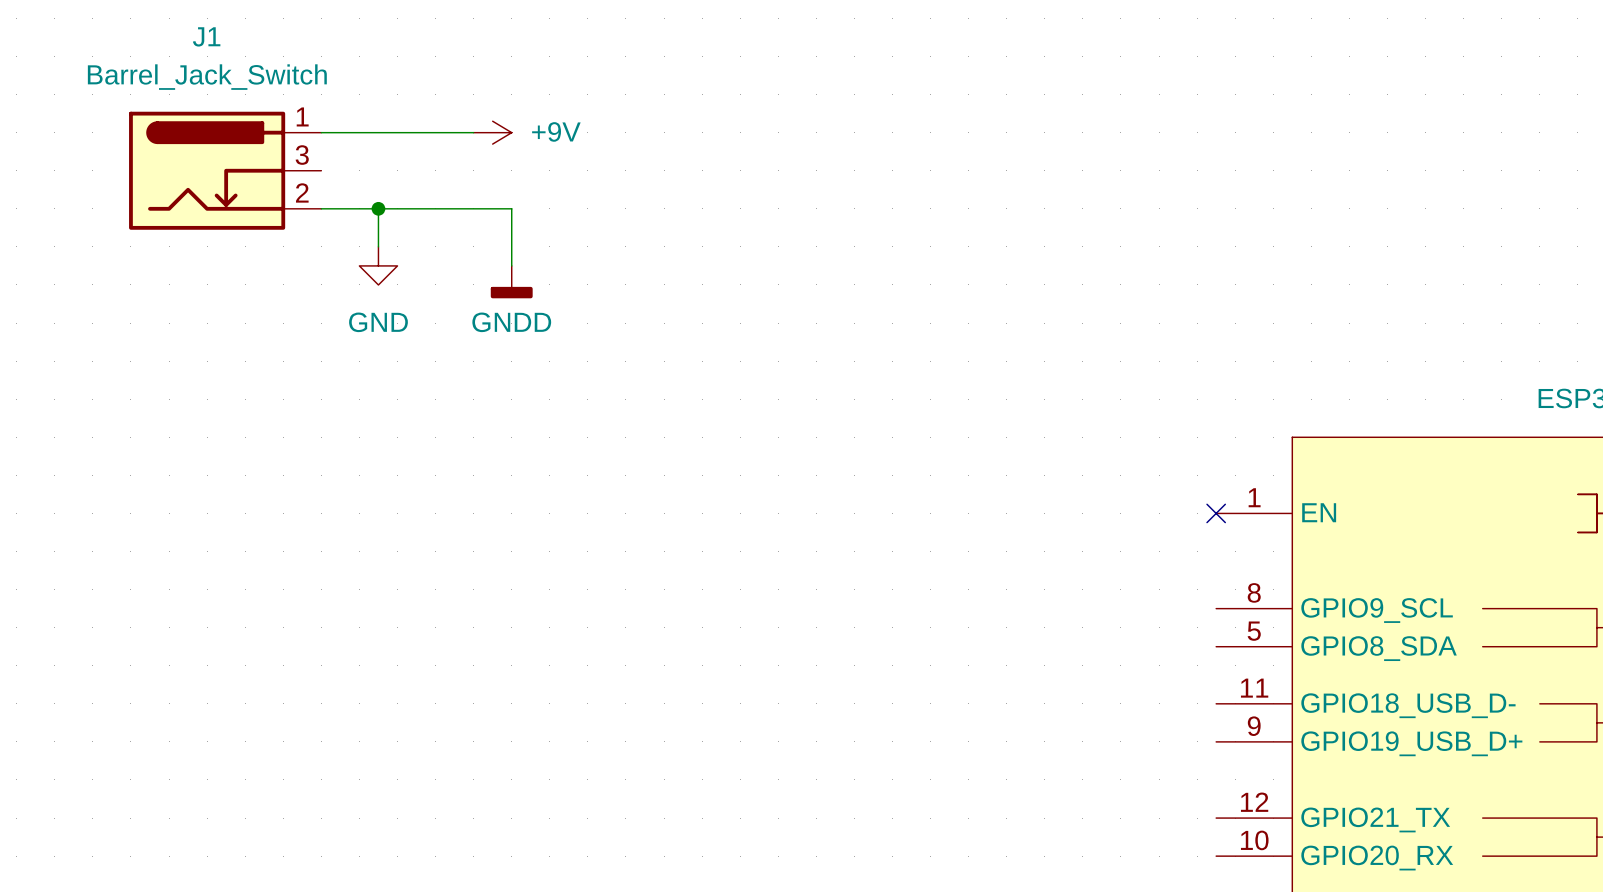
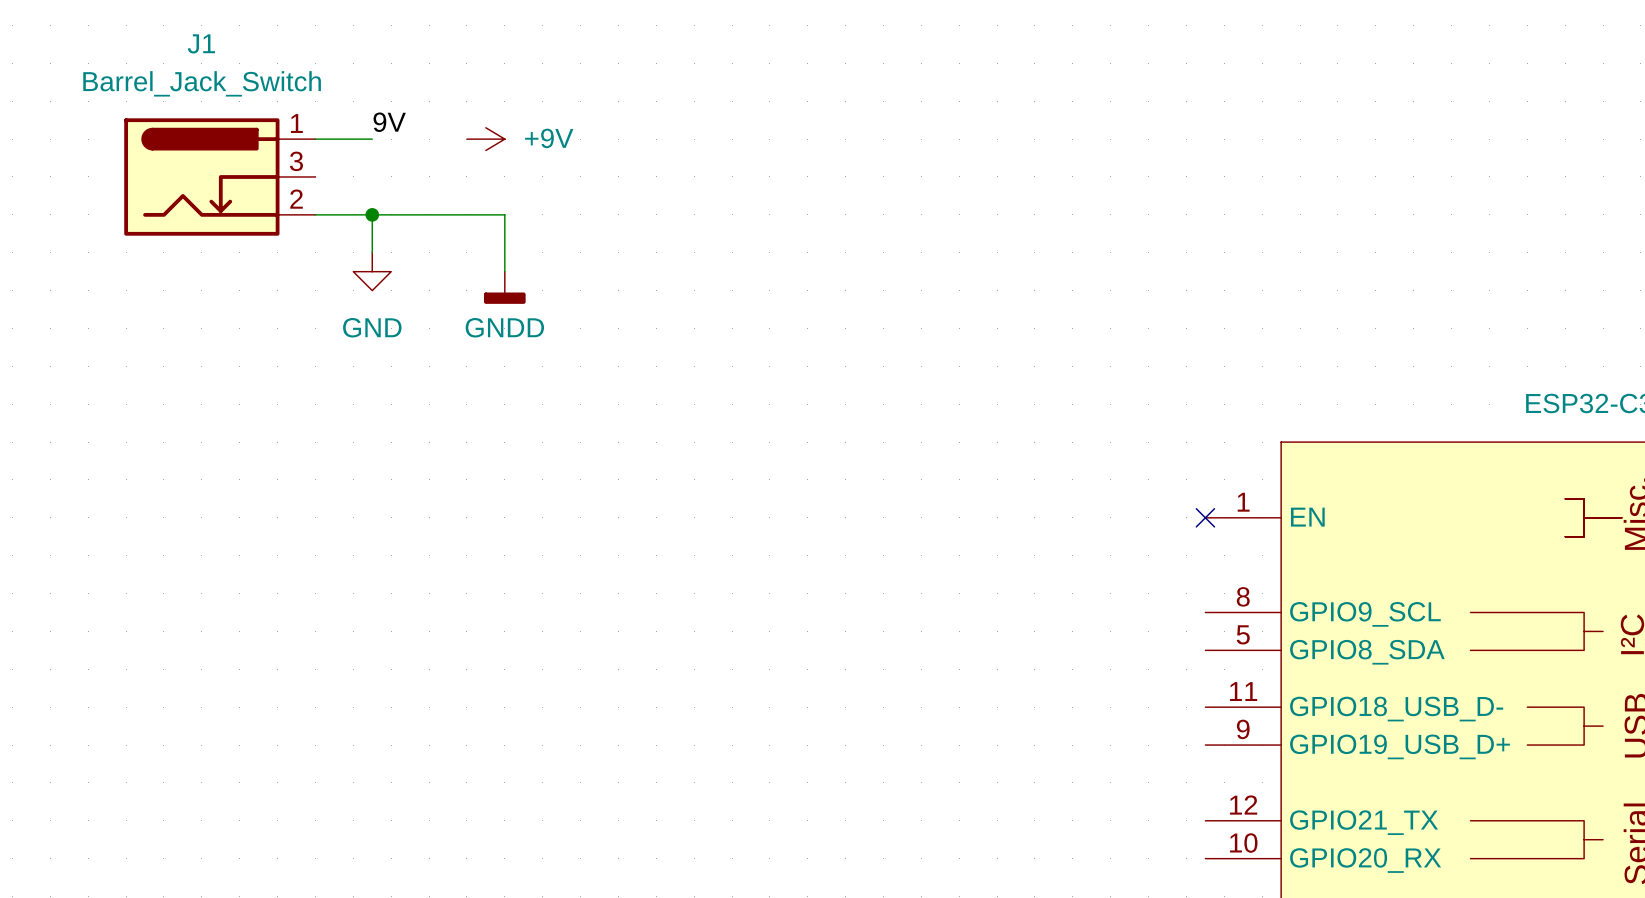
label: none -> 9V (389, 122)
wire: (378, 132) (473, 132) -> none

